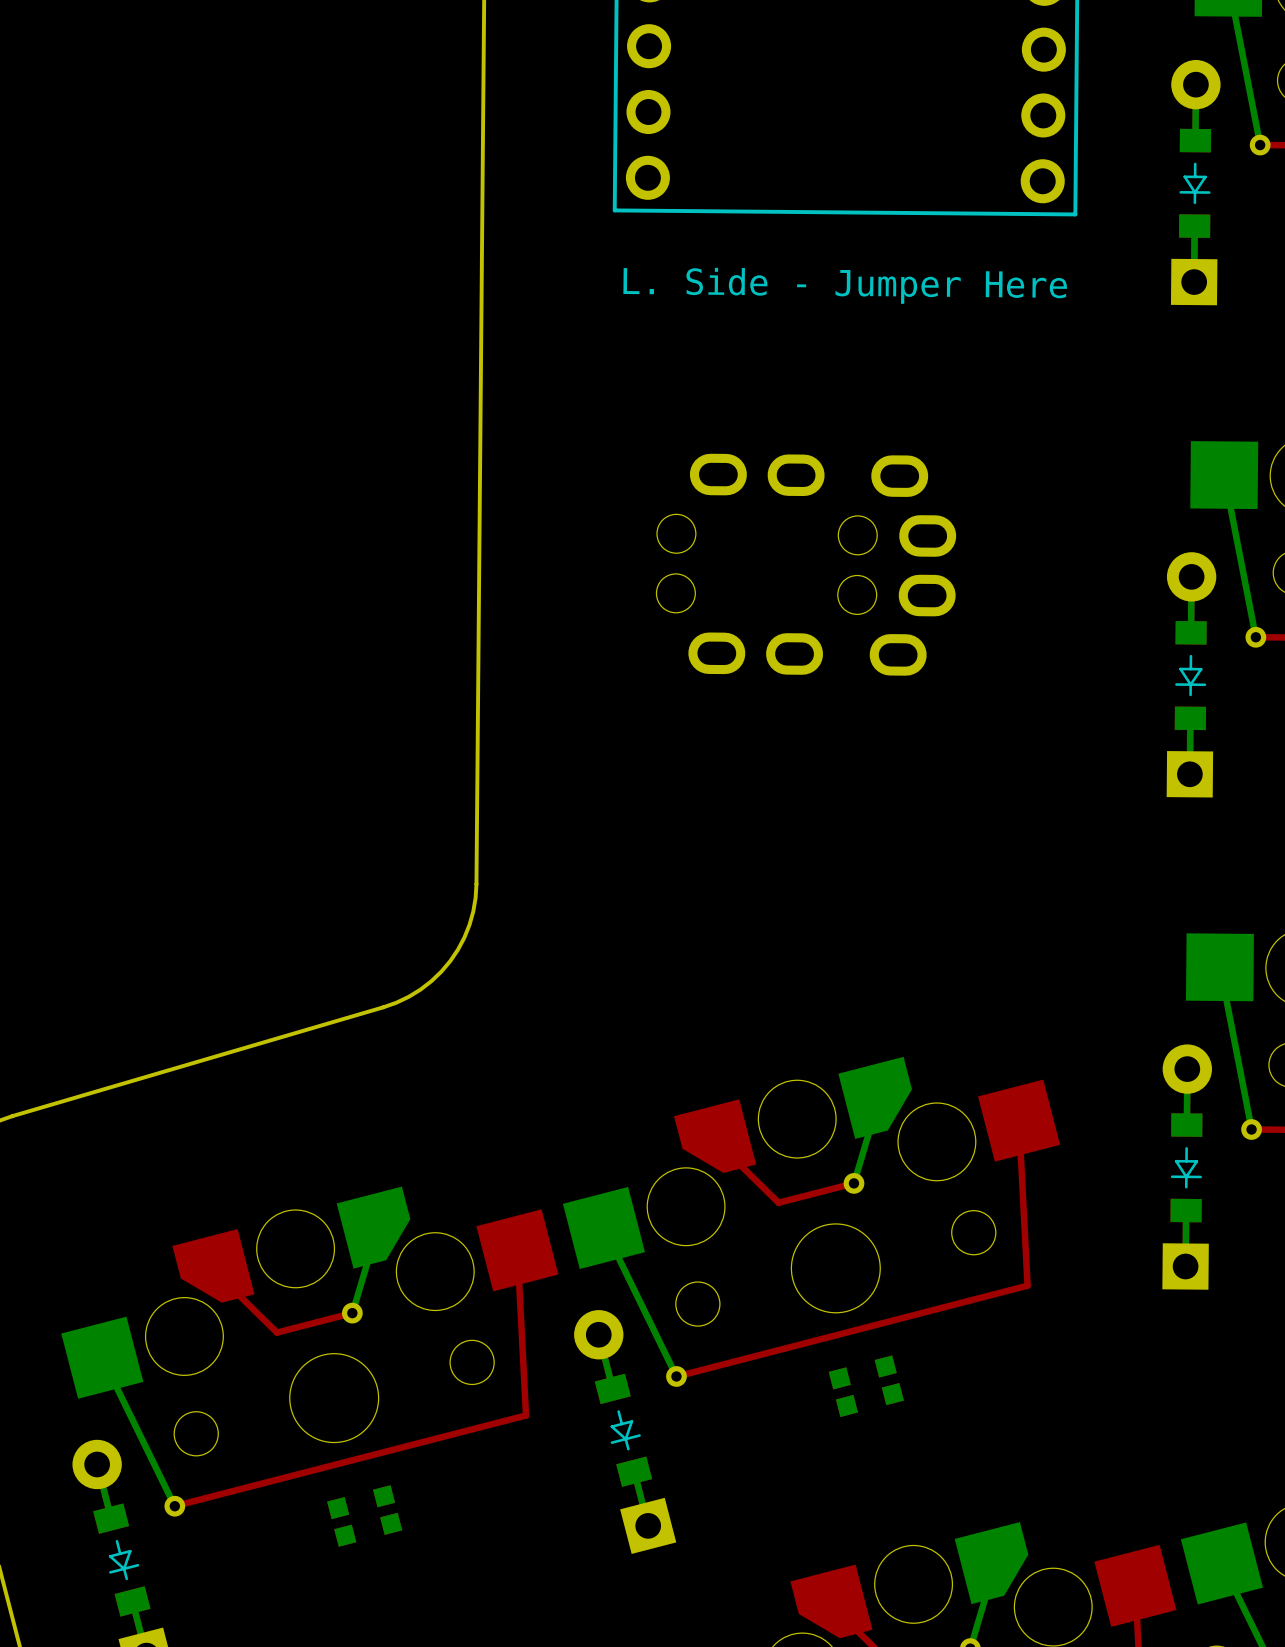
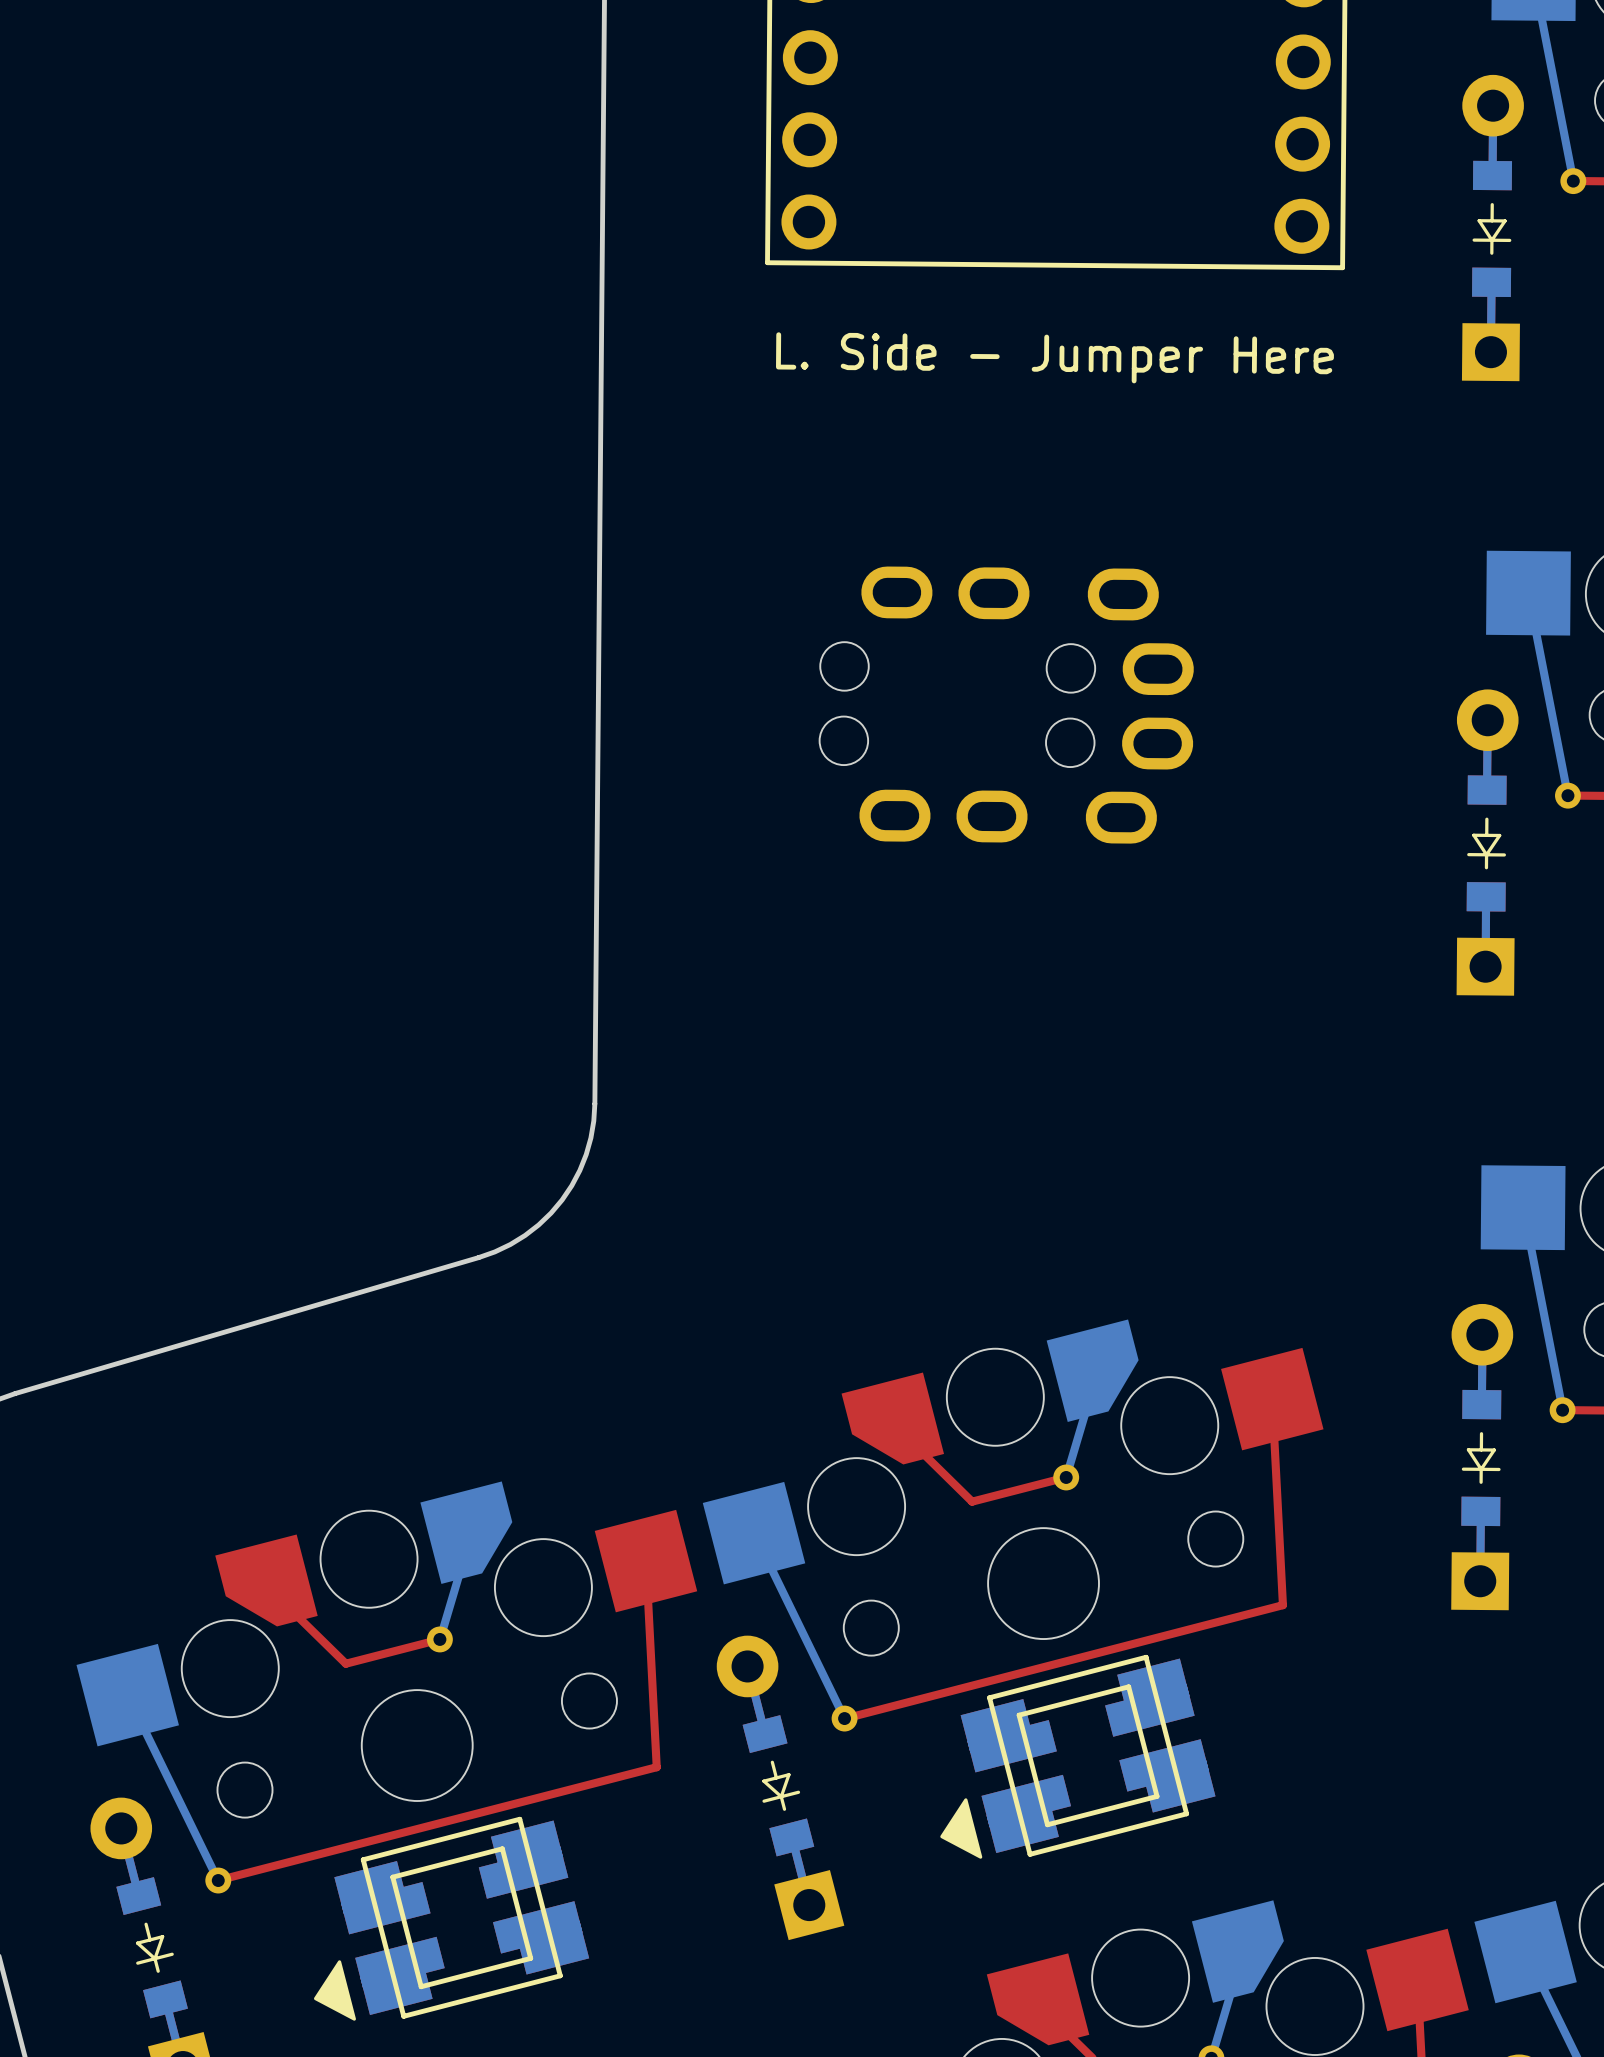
part: (866, 1386) -> none
part: none -> (1077, 1756)
part: (364, 1515) -> none
part: none -> (451, 1918)

